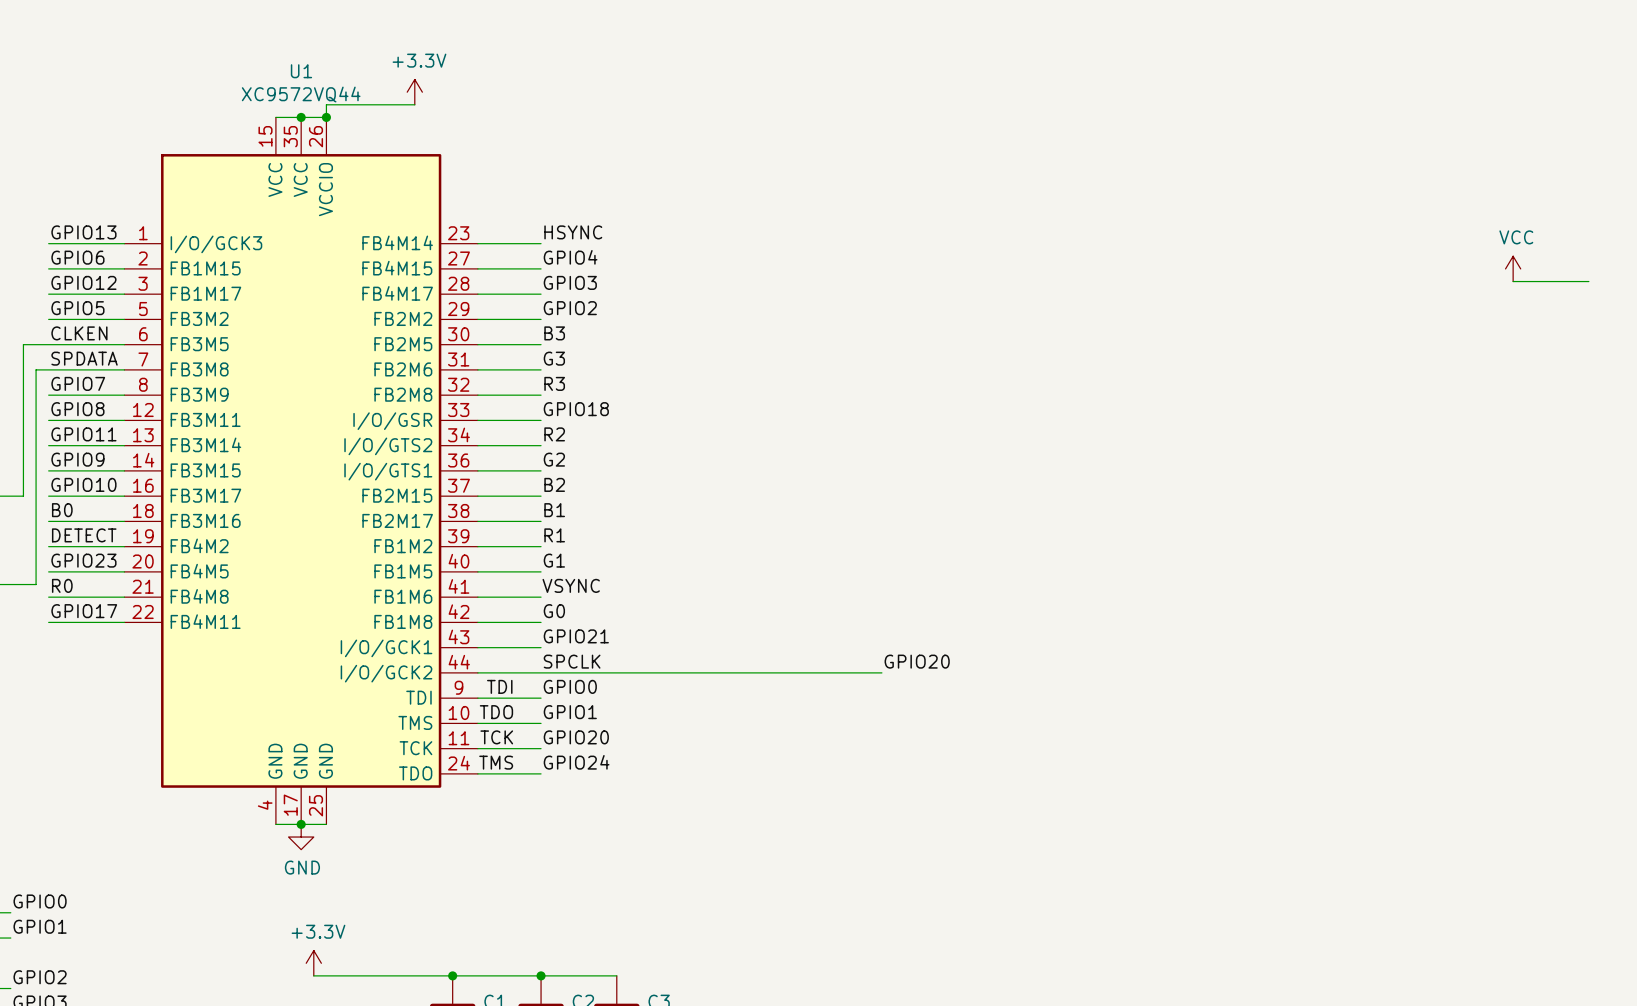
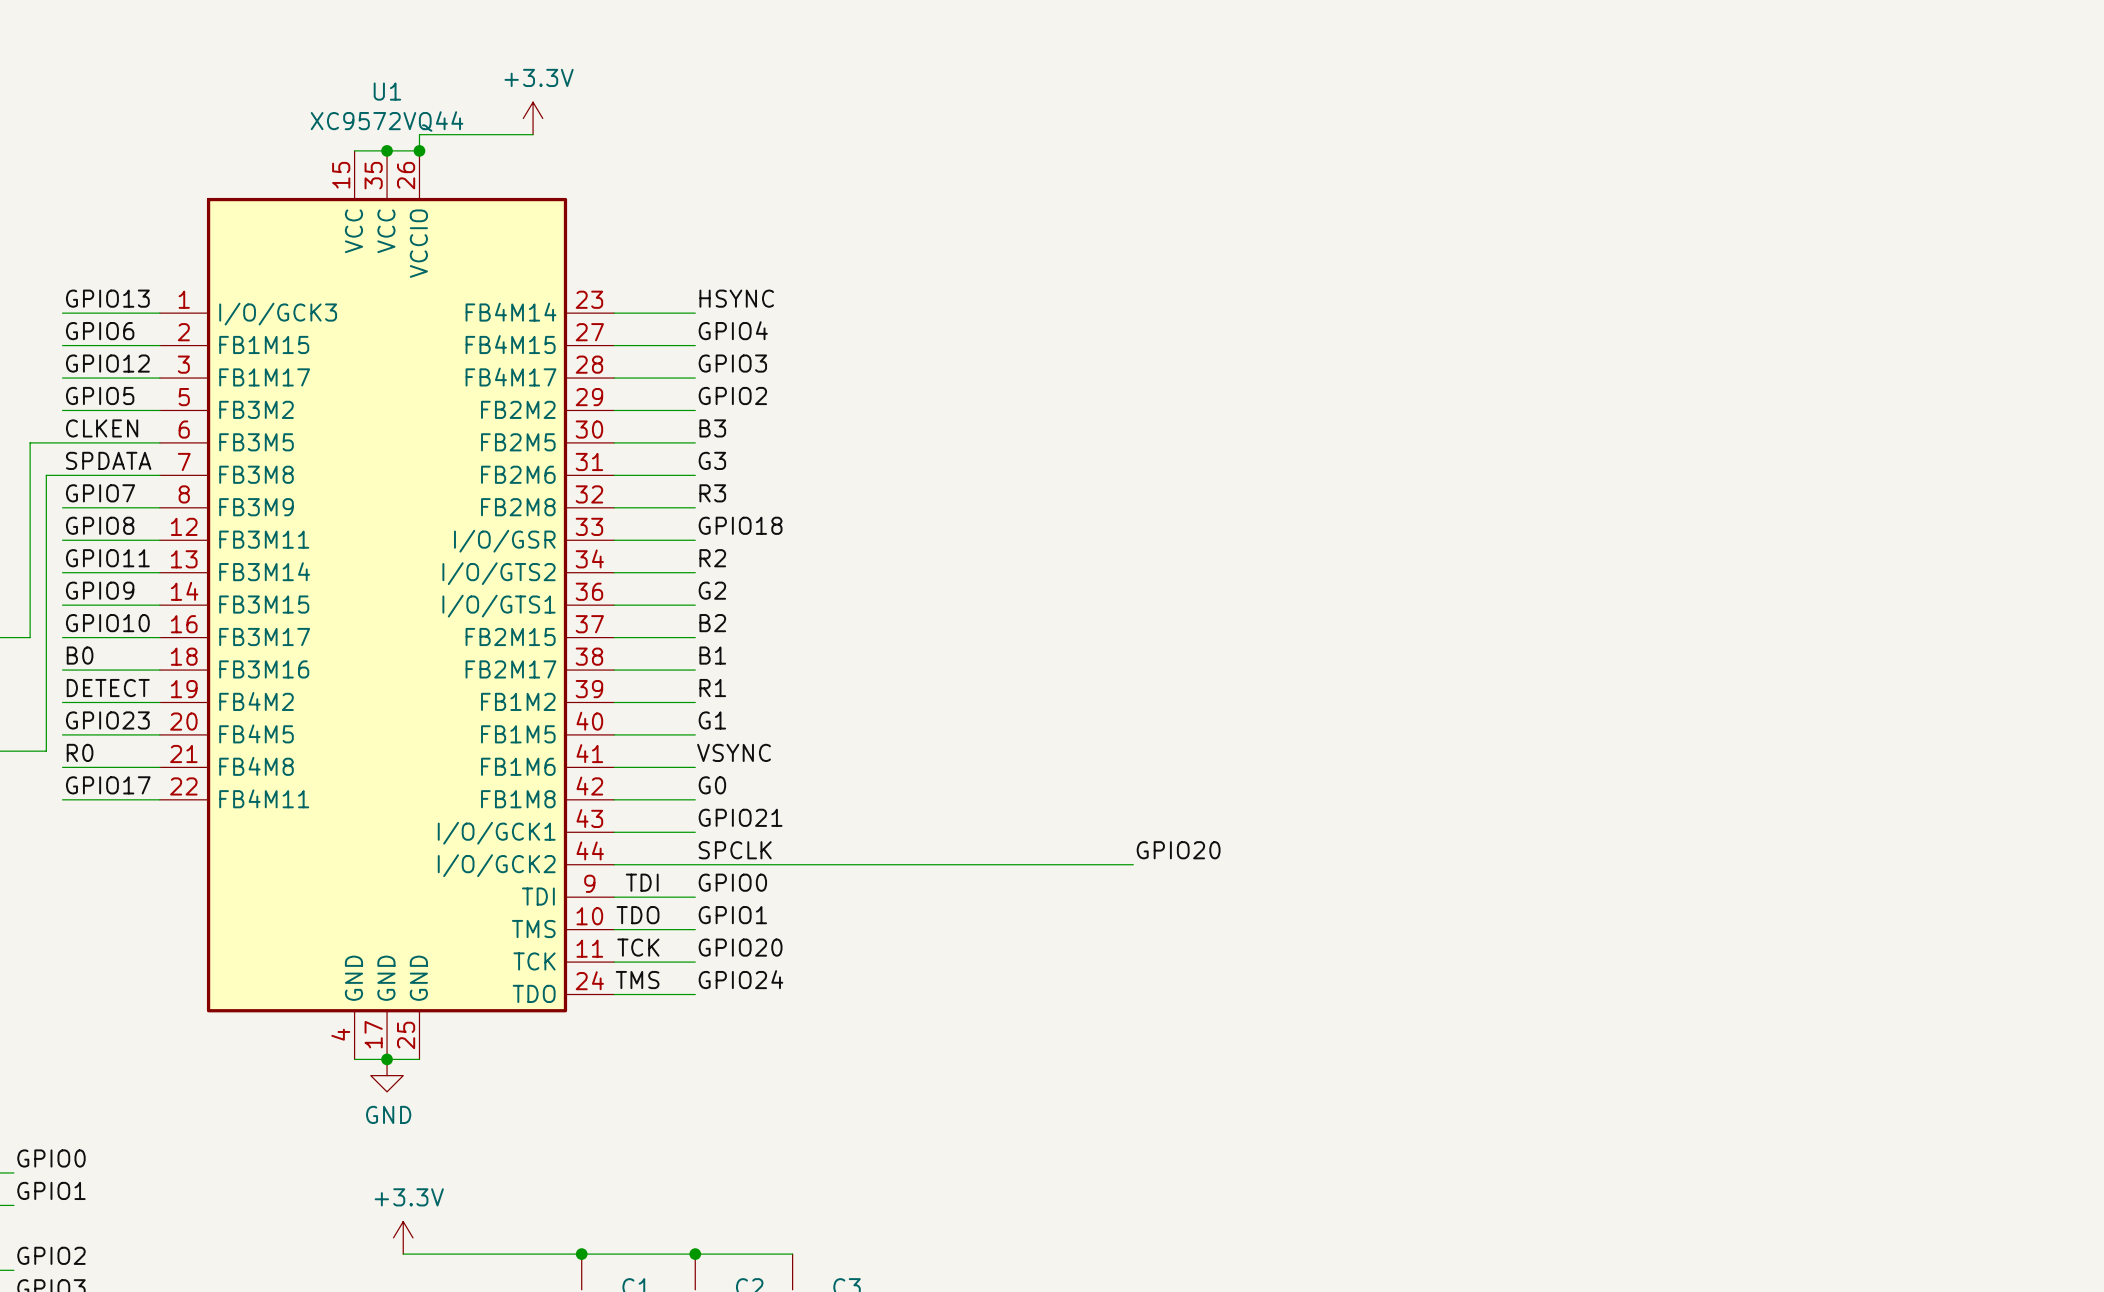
power symbol: VCC (1513, 268) -> none
wire: (1513, 281) (1588, 281) -> none

